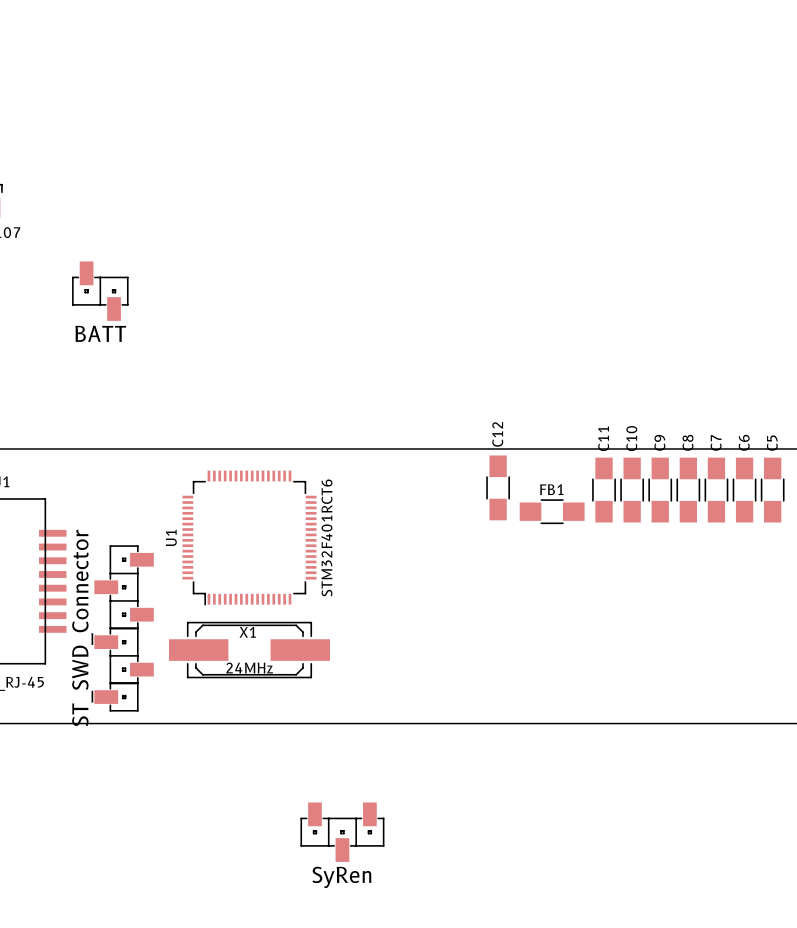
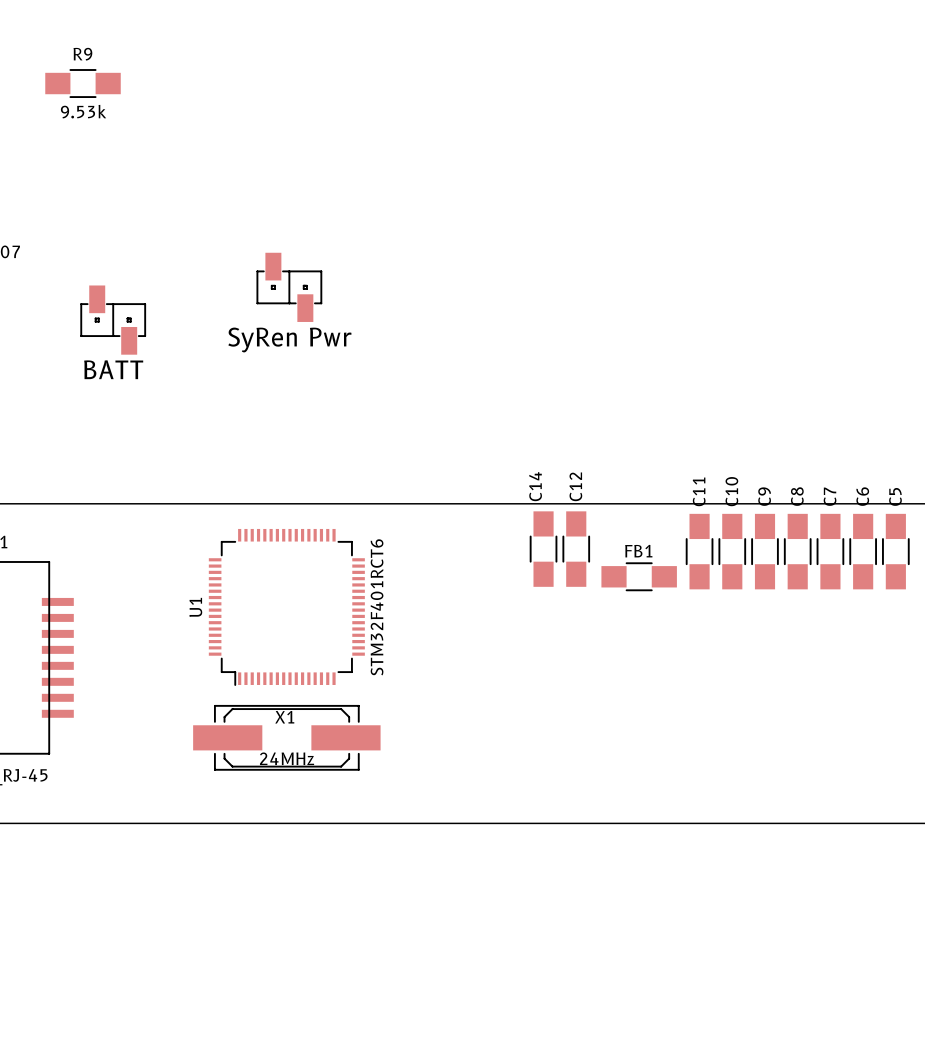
R9: none -> 9.53k (83, 83)
part: none -> SyRen Pwr (289, 287)
C14: none -> (543, 549)
part: ST_SWD_Connector (124, 628) -> none
part: SyRen (342, 832) -> none

